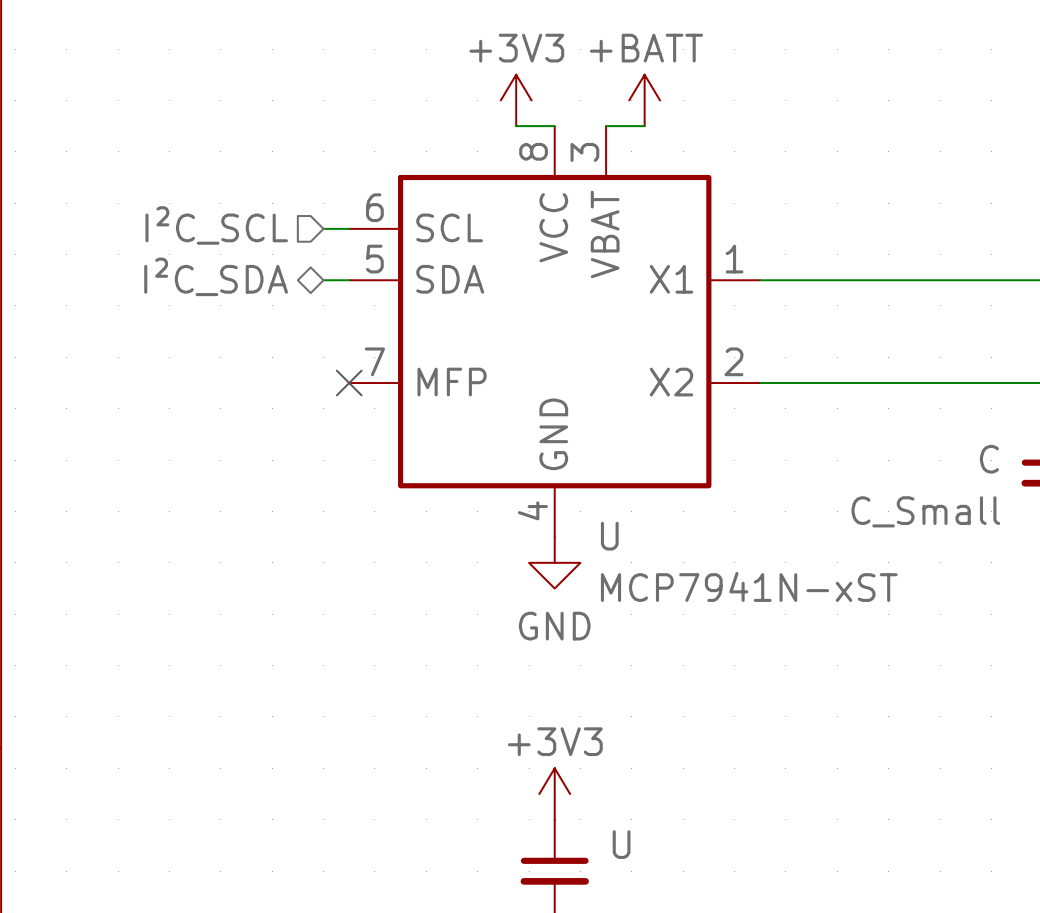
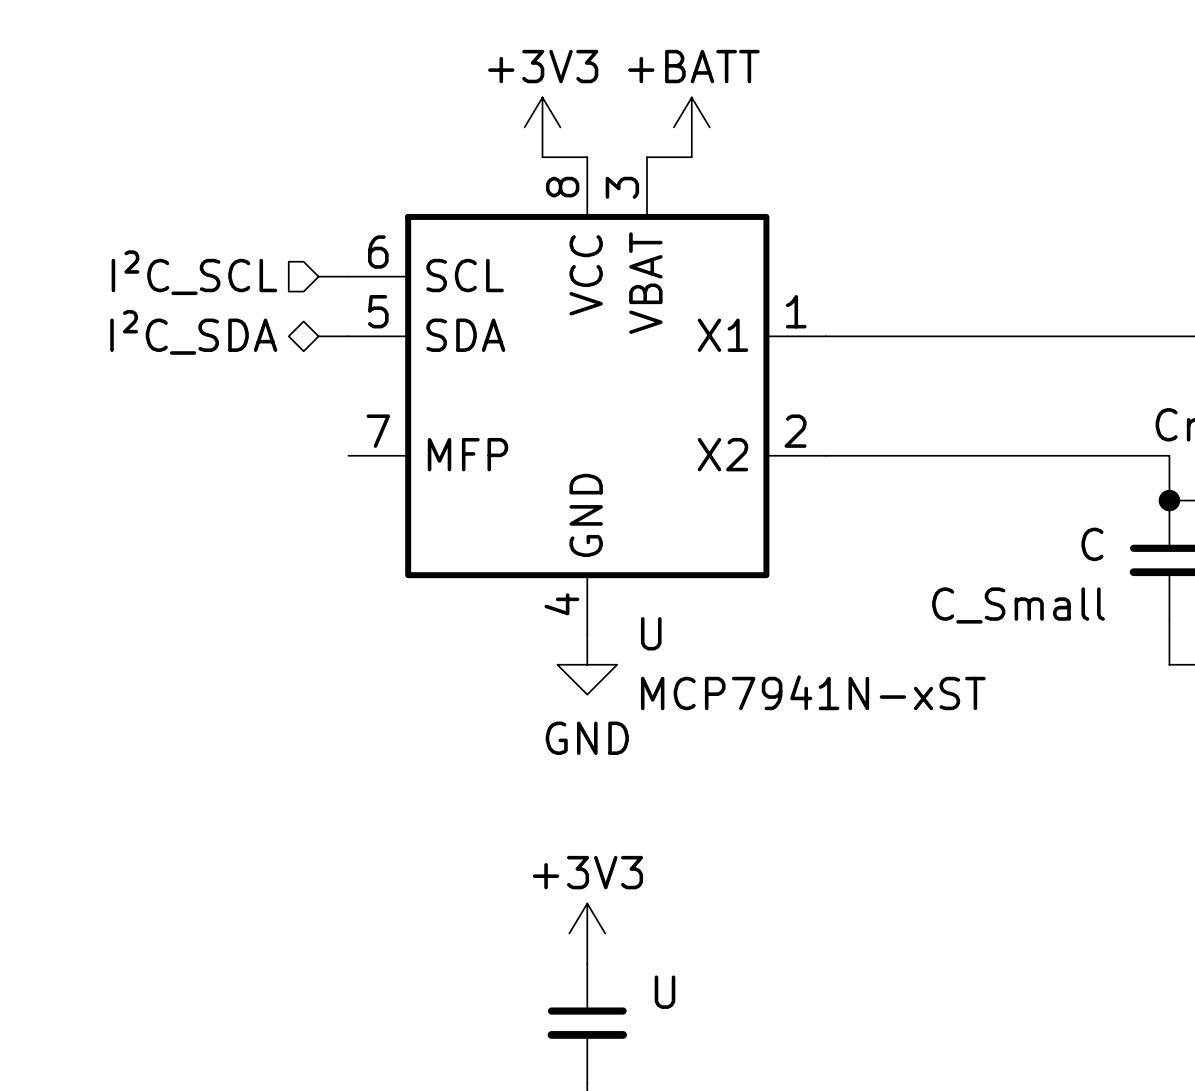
no-connect mark: (349, 383) -> none

